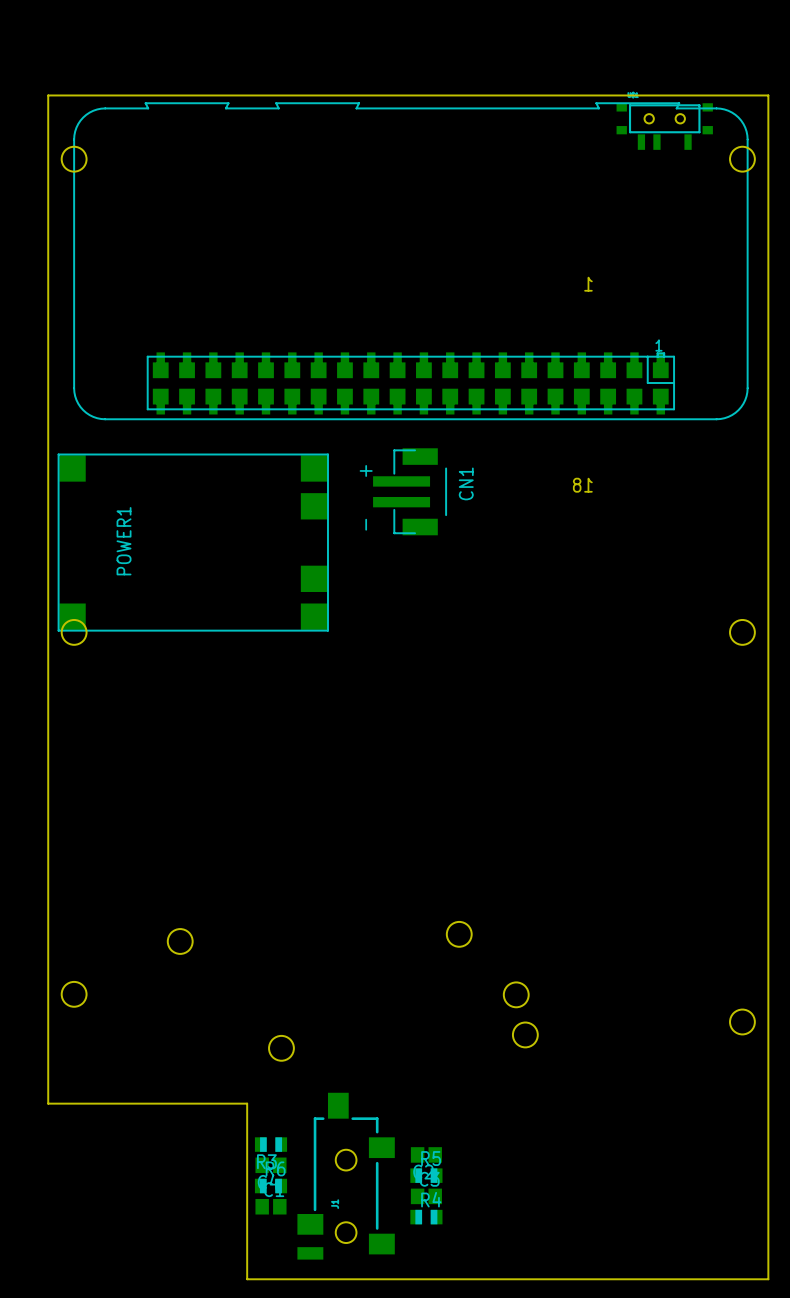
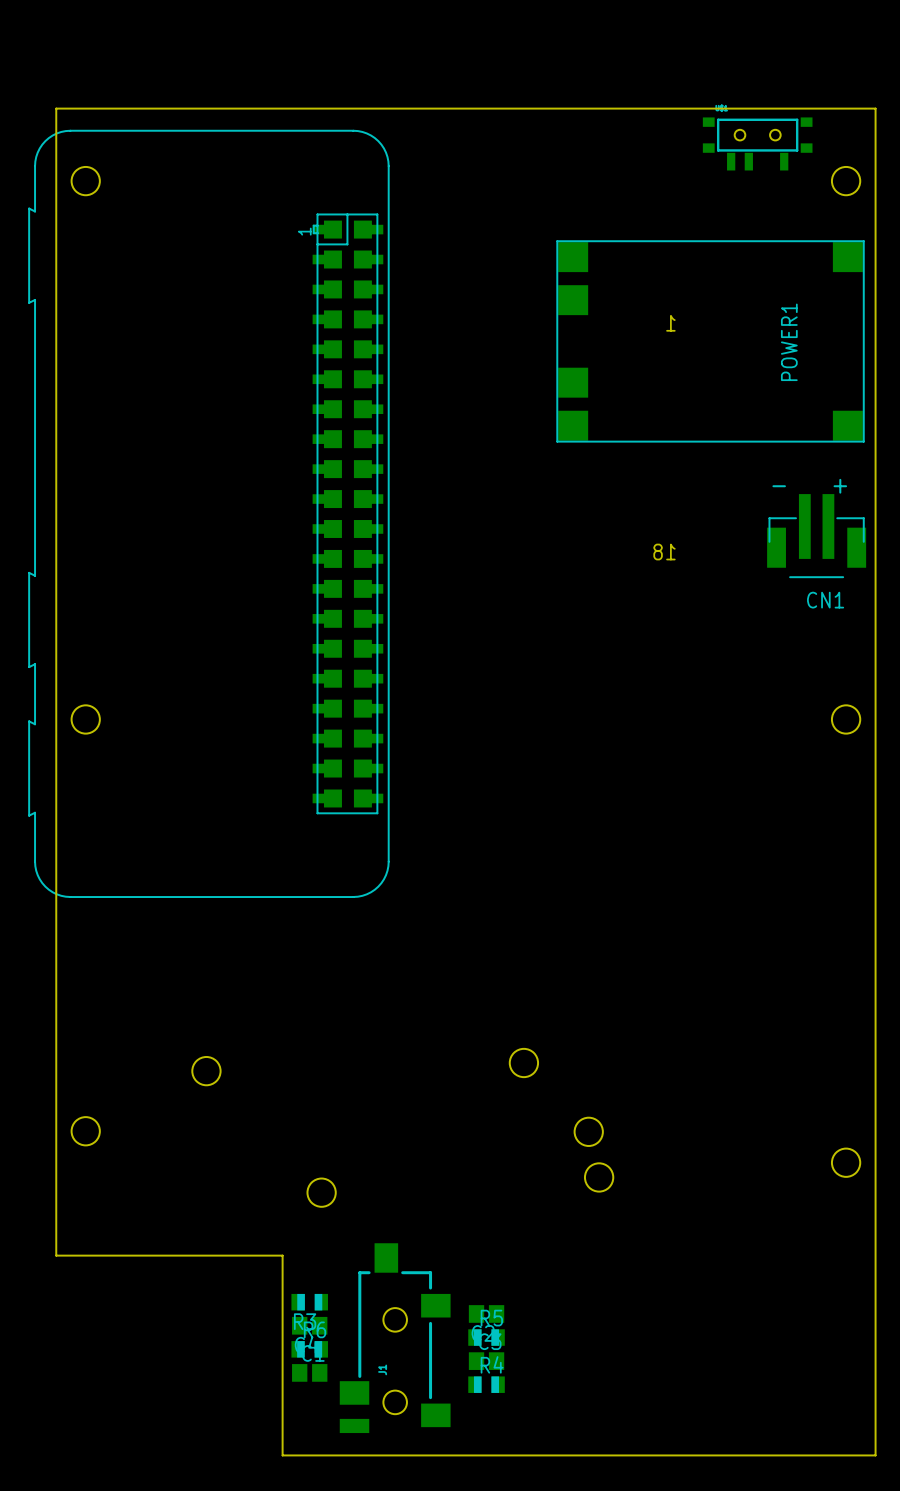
part: (410, 261) -> none
part: none -> (208, 513)
CN1 rotation: 0° (409, 491) -> 90° clockwise (816, 536)
CN1 position: (409, 491) -> (816, 536)
POWER1 rotation: 0° (193, 542) -> 180° (710, 341)
POWER1 position: (193, 542) -> (710, 341)

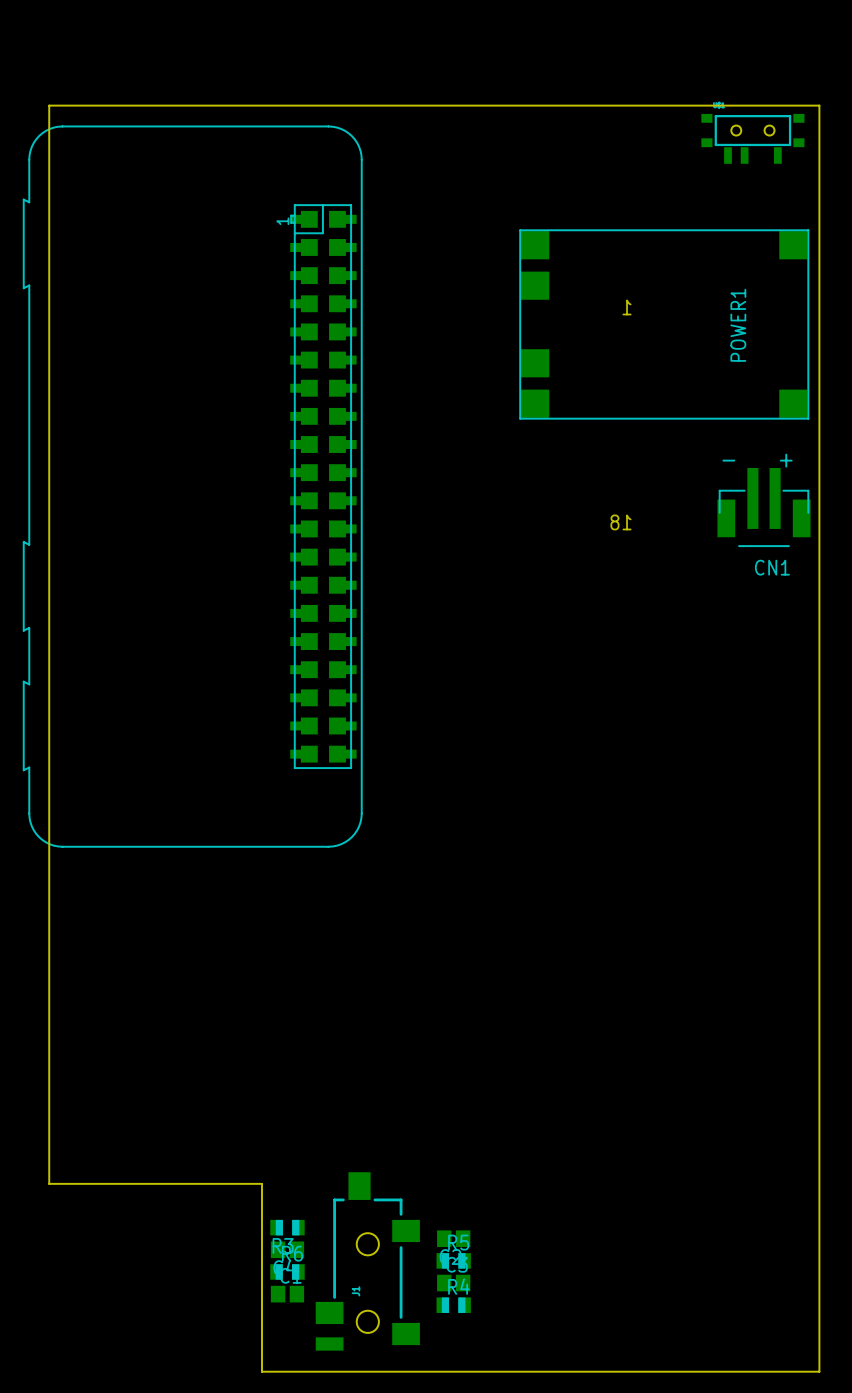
part position: (757, 143) -> (752, 138)
round board edge: [71, 166, 101, 196] -> none
round board edge: [831, 166, 861, 196] -> none
round board edge: [71, 704, 101, 735] -> none
round board edge: [831, 704, 861, 735] -> none
round board edge: [509, 1048, 539, 1078] -> none
round board edge: [191, 1056, 222, 1086] -> none
round board edge: [71, 1116, 101, 1146] -> none
round board edge: [574, 1117, 604, 1147] -> none
round board edge: [831, 1148, 861, 1178] -> none
round board edge: [584, 1162, 614, 1193] -> none
round board edge: [307, 1178, 337, 1208] -> none

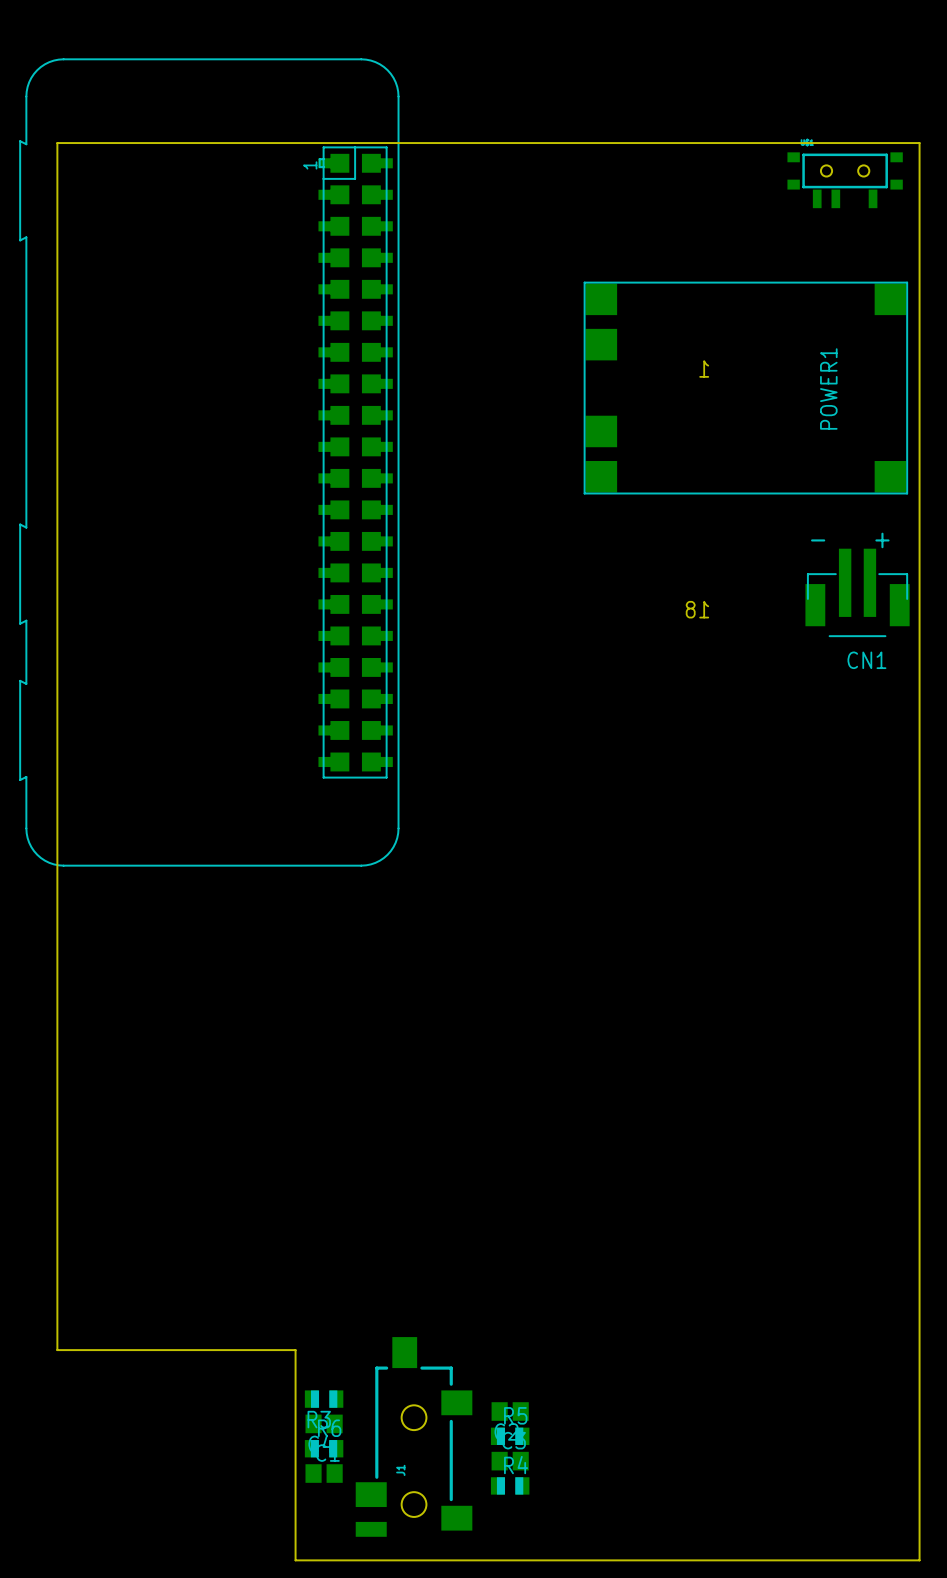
part position: (192, 486) -> (209, 462)

